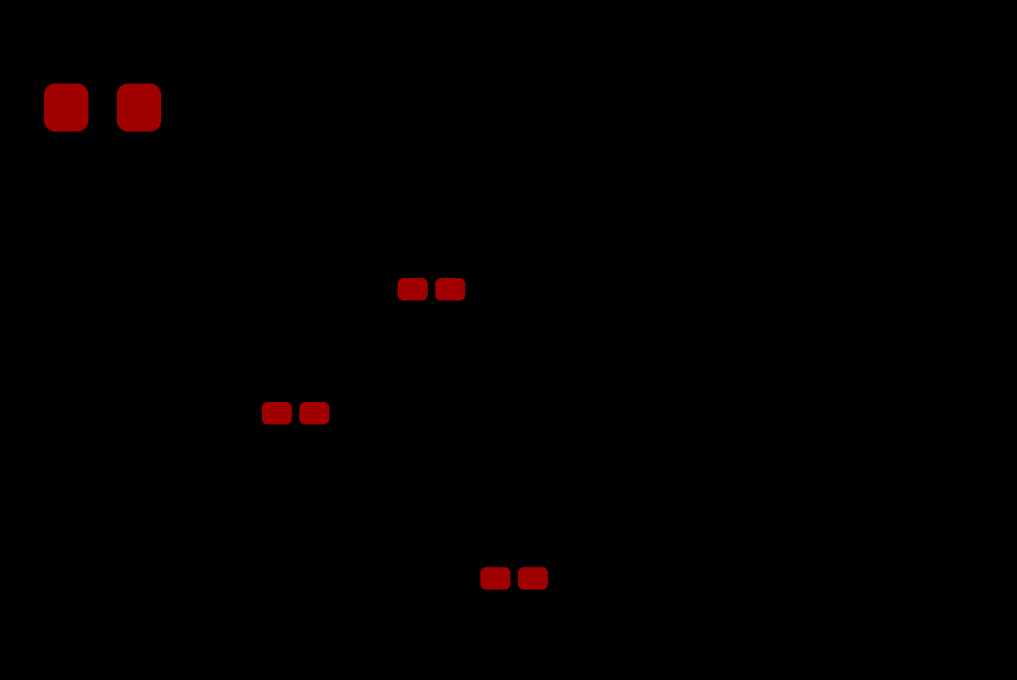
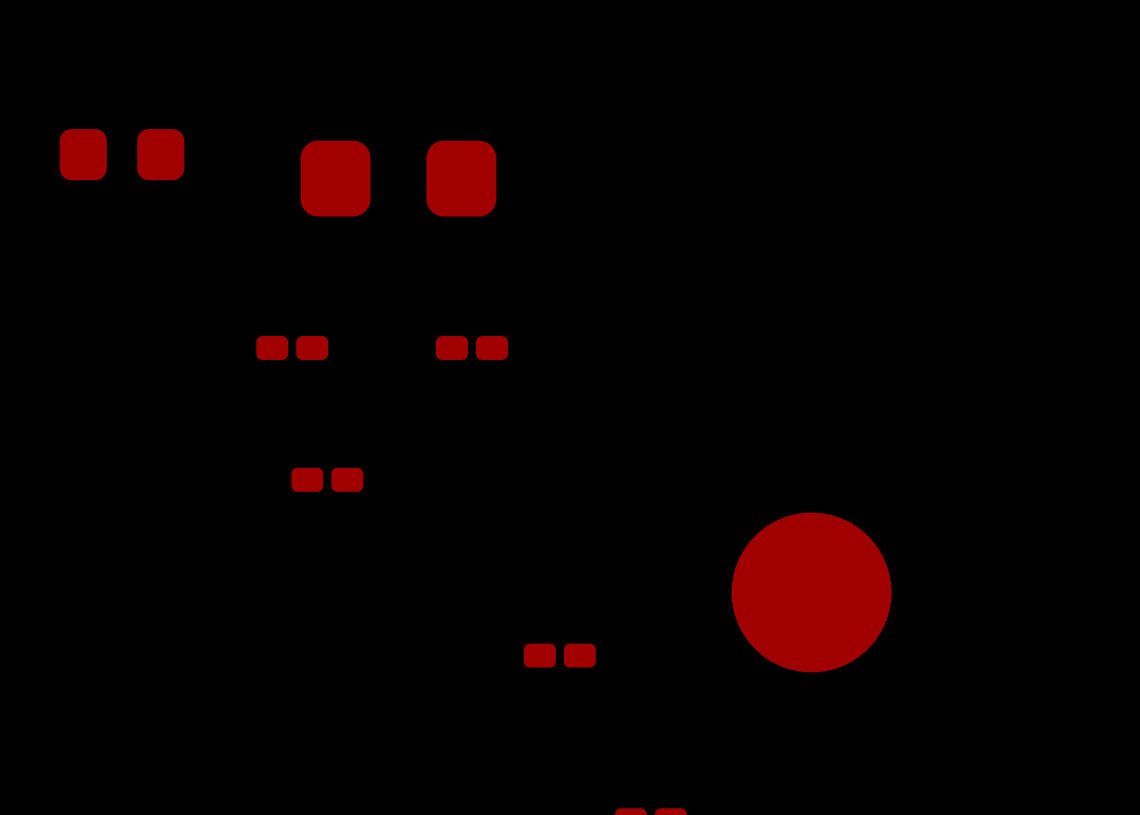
part: none -> (398, 178)
part: none -> (292, 347)
part: none -> (811, 592)

